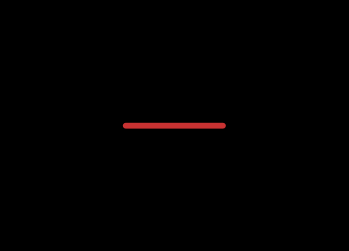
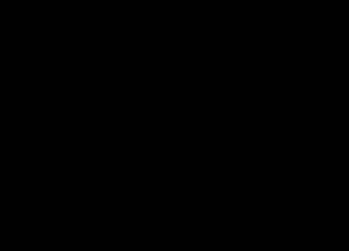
line: (125, 125) (222, 125) -> none

